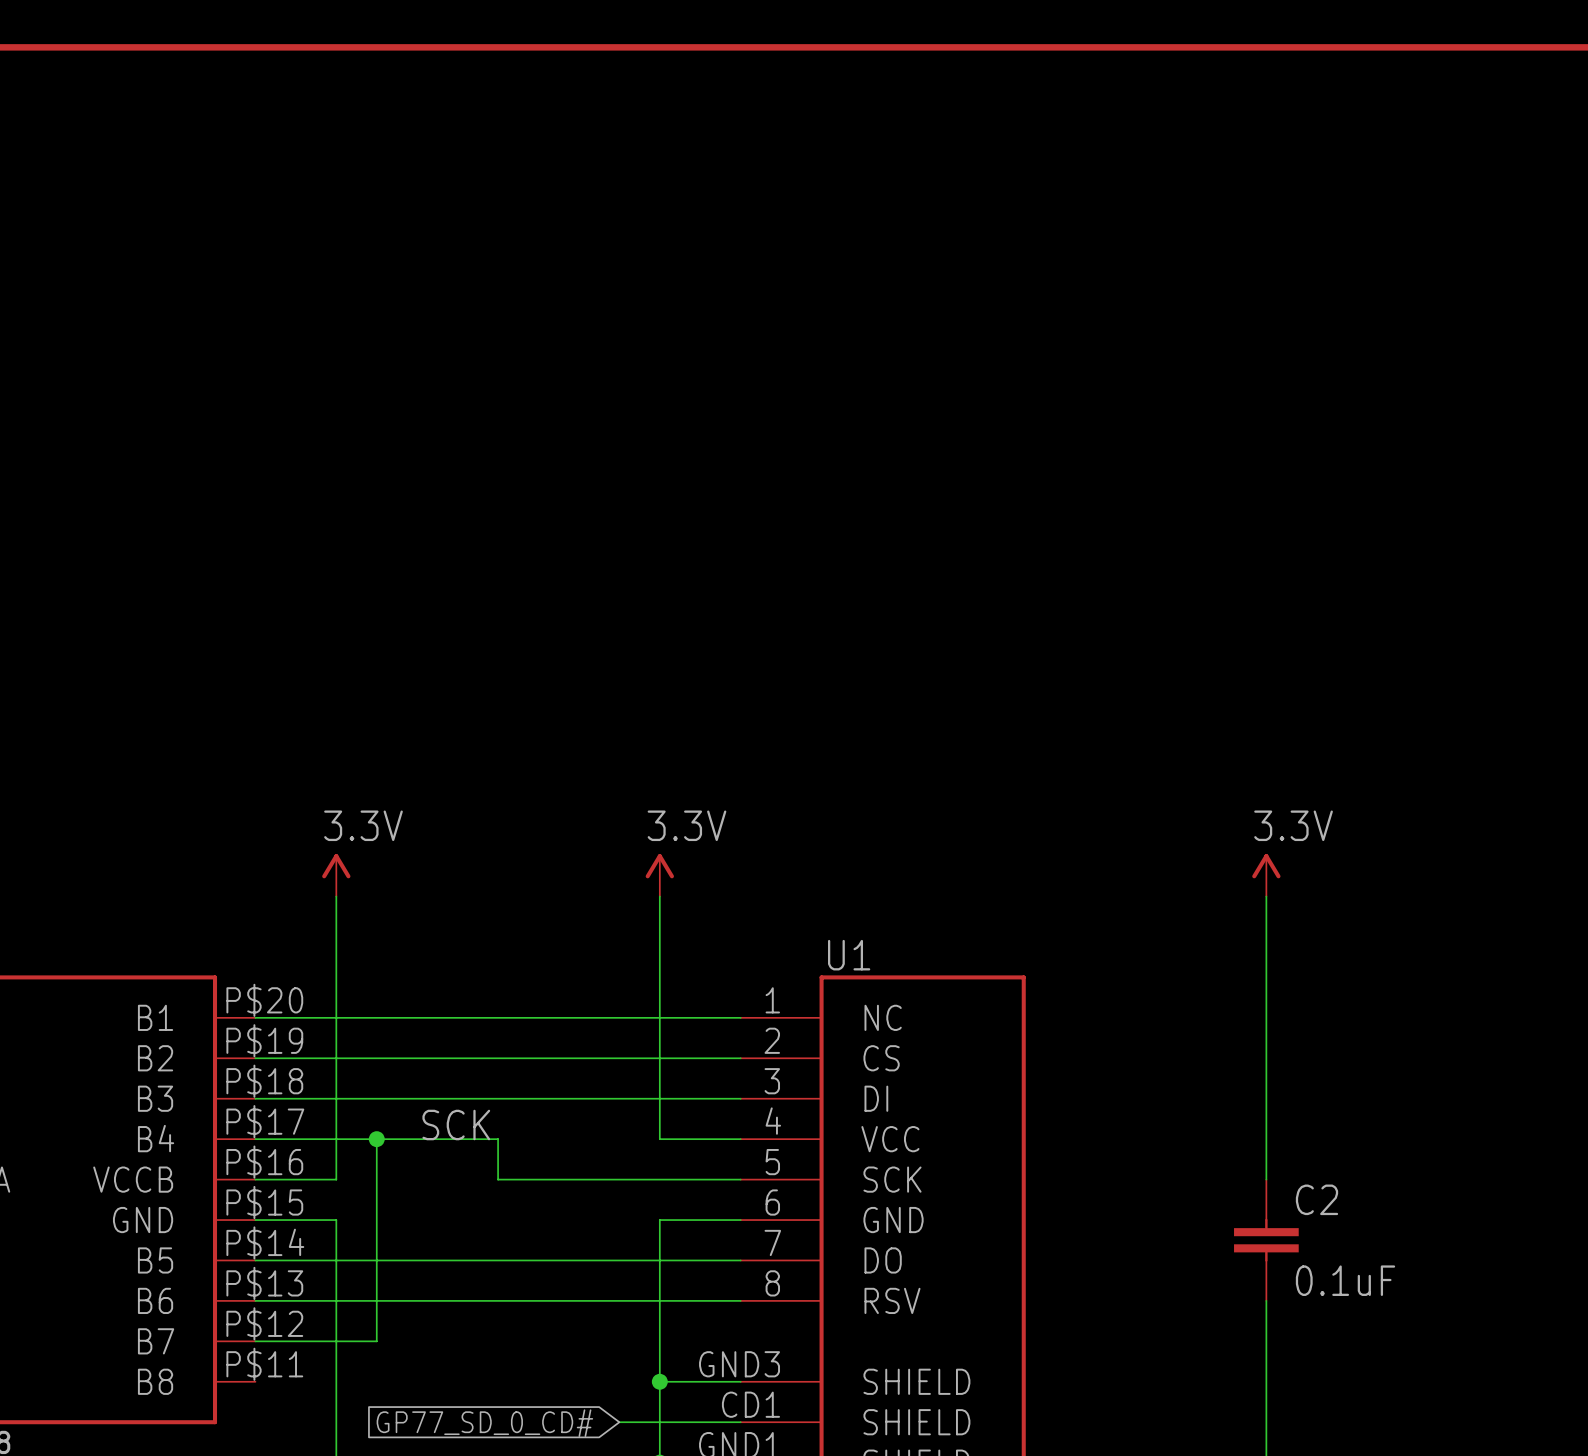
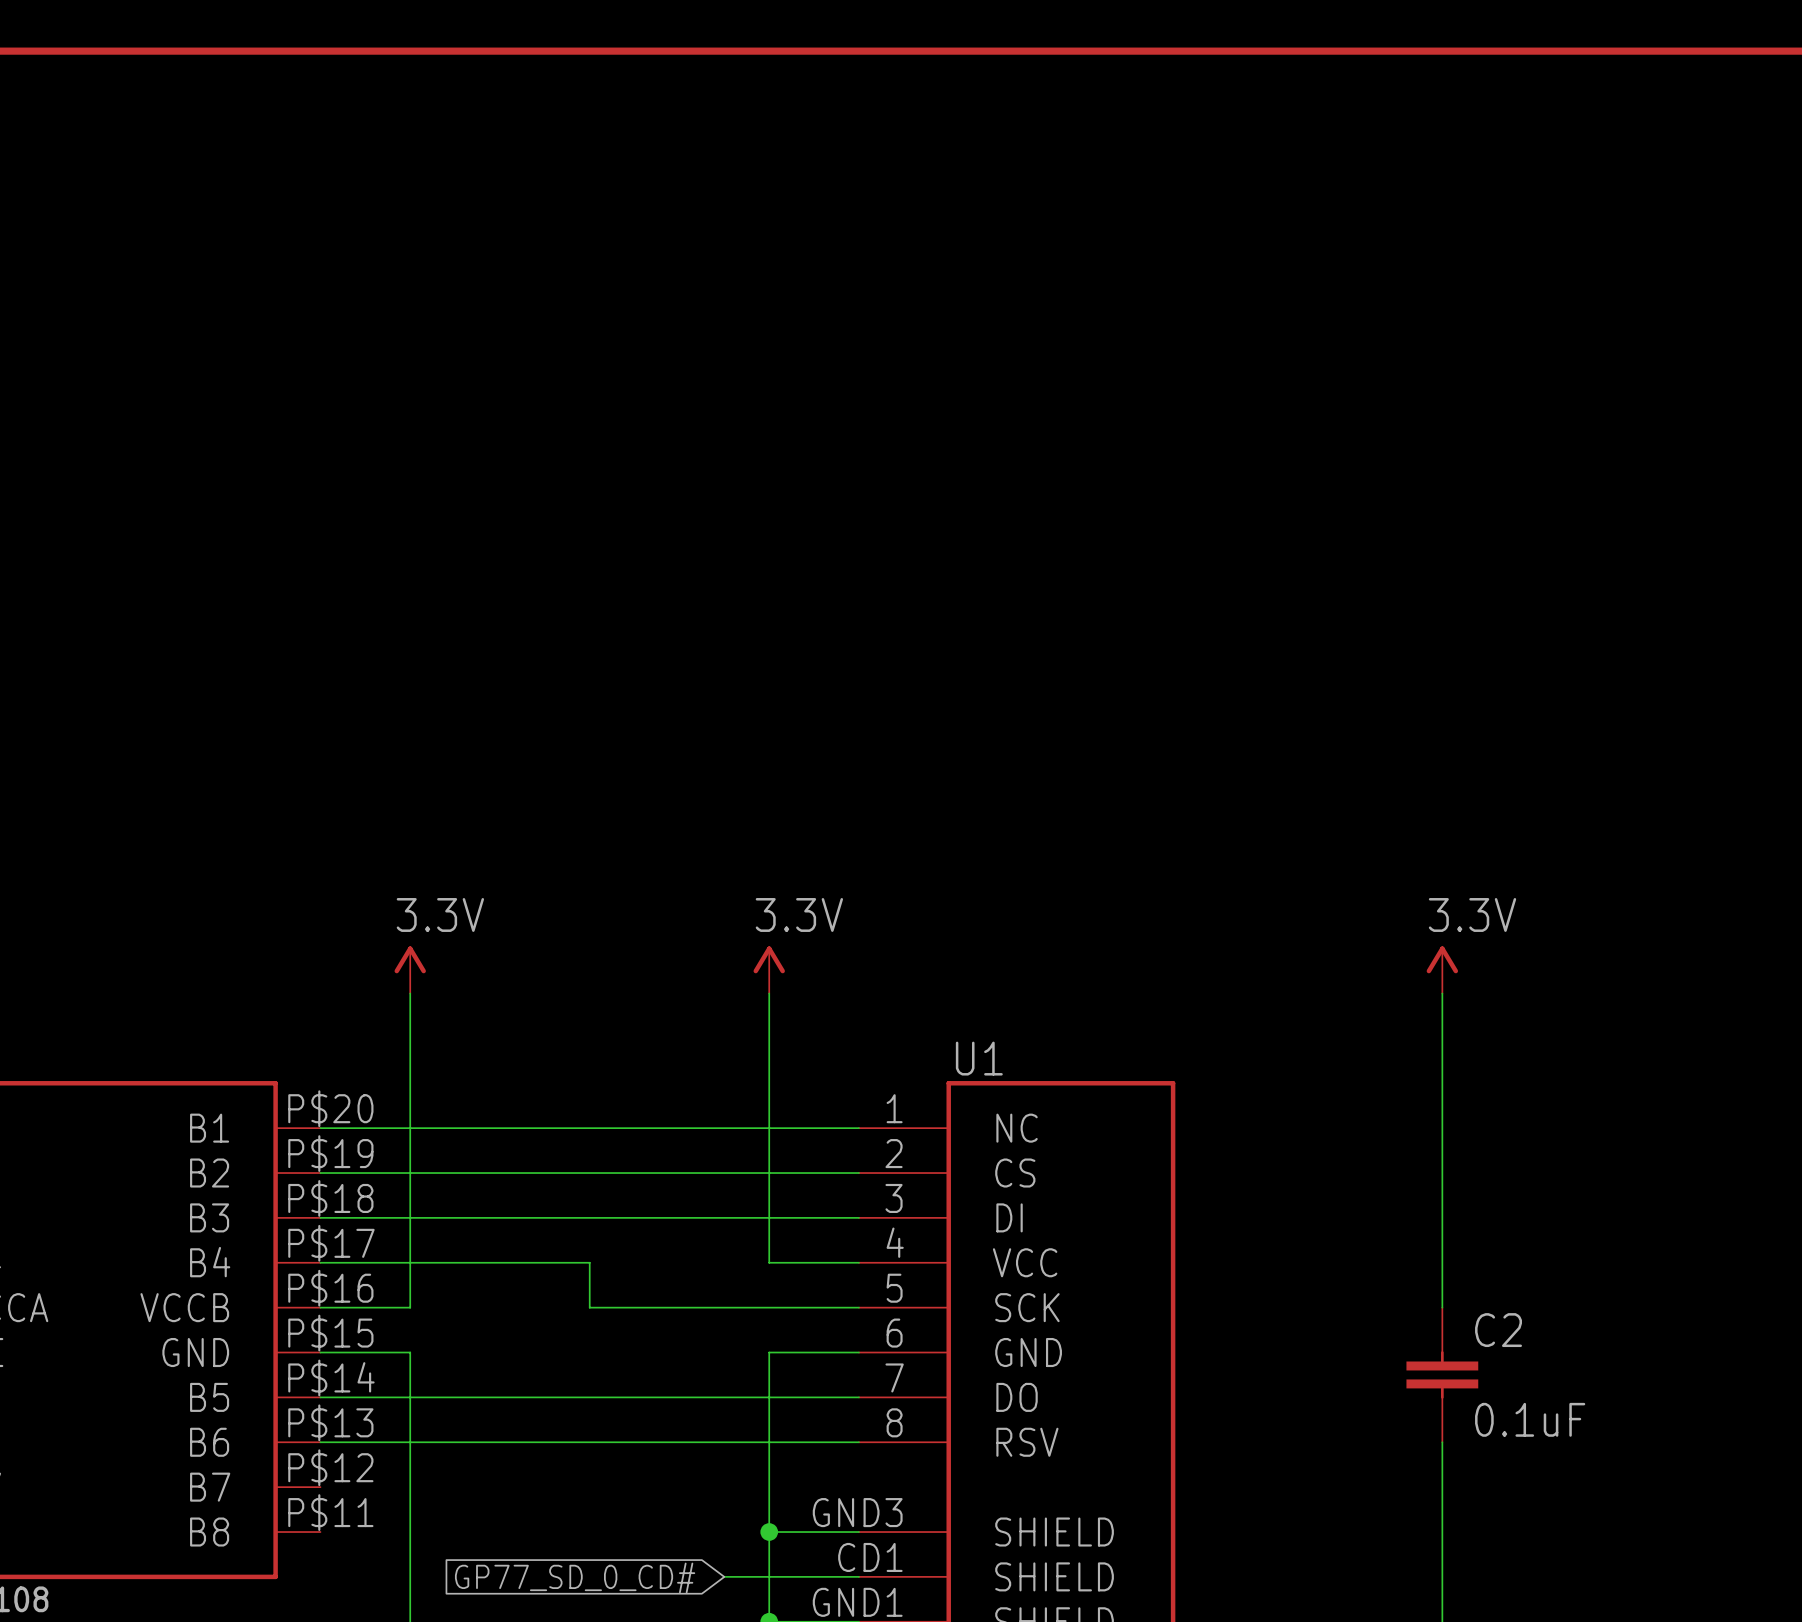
label: SCK (456, 1125) -> none
wire: (376, 1139) (376, 1341) (255, 1341) -> none
junction: (376, 1139) -> none

